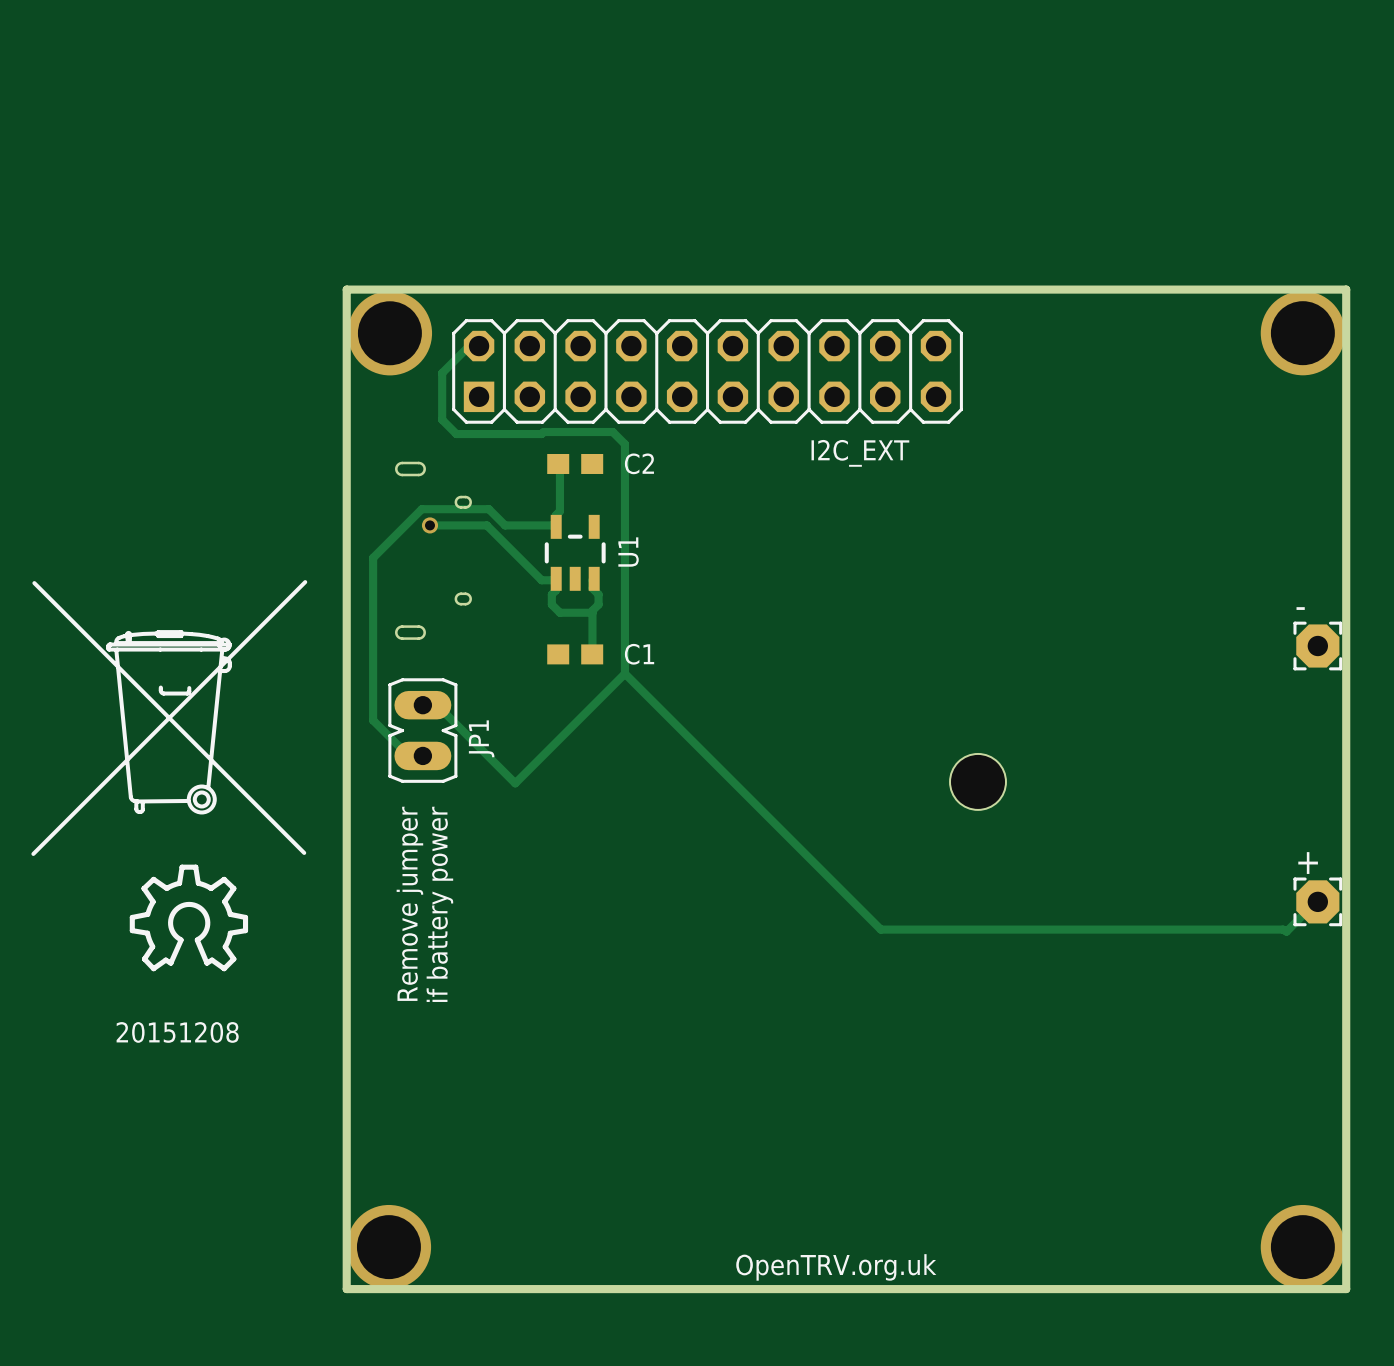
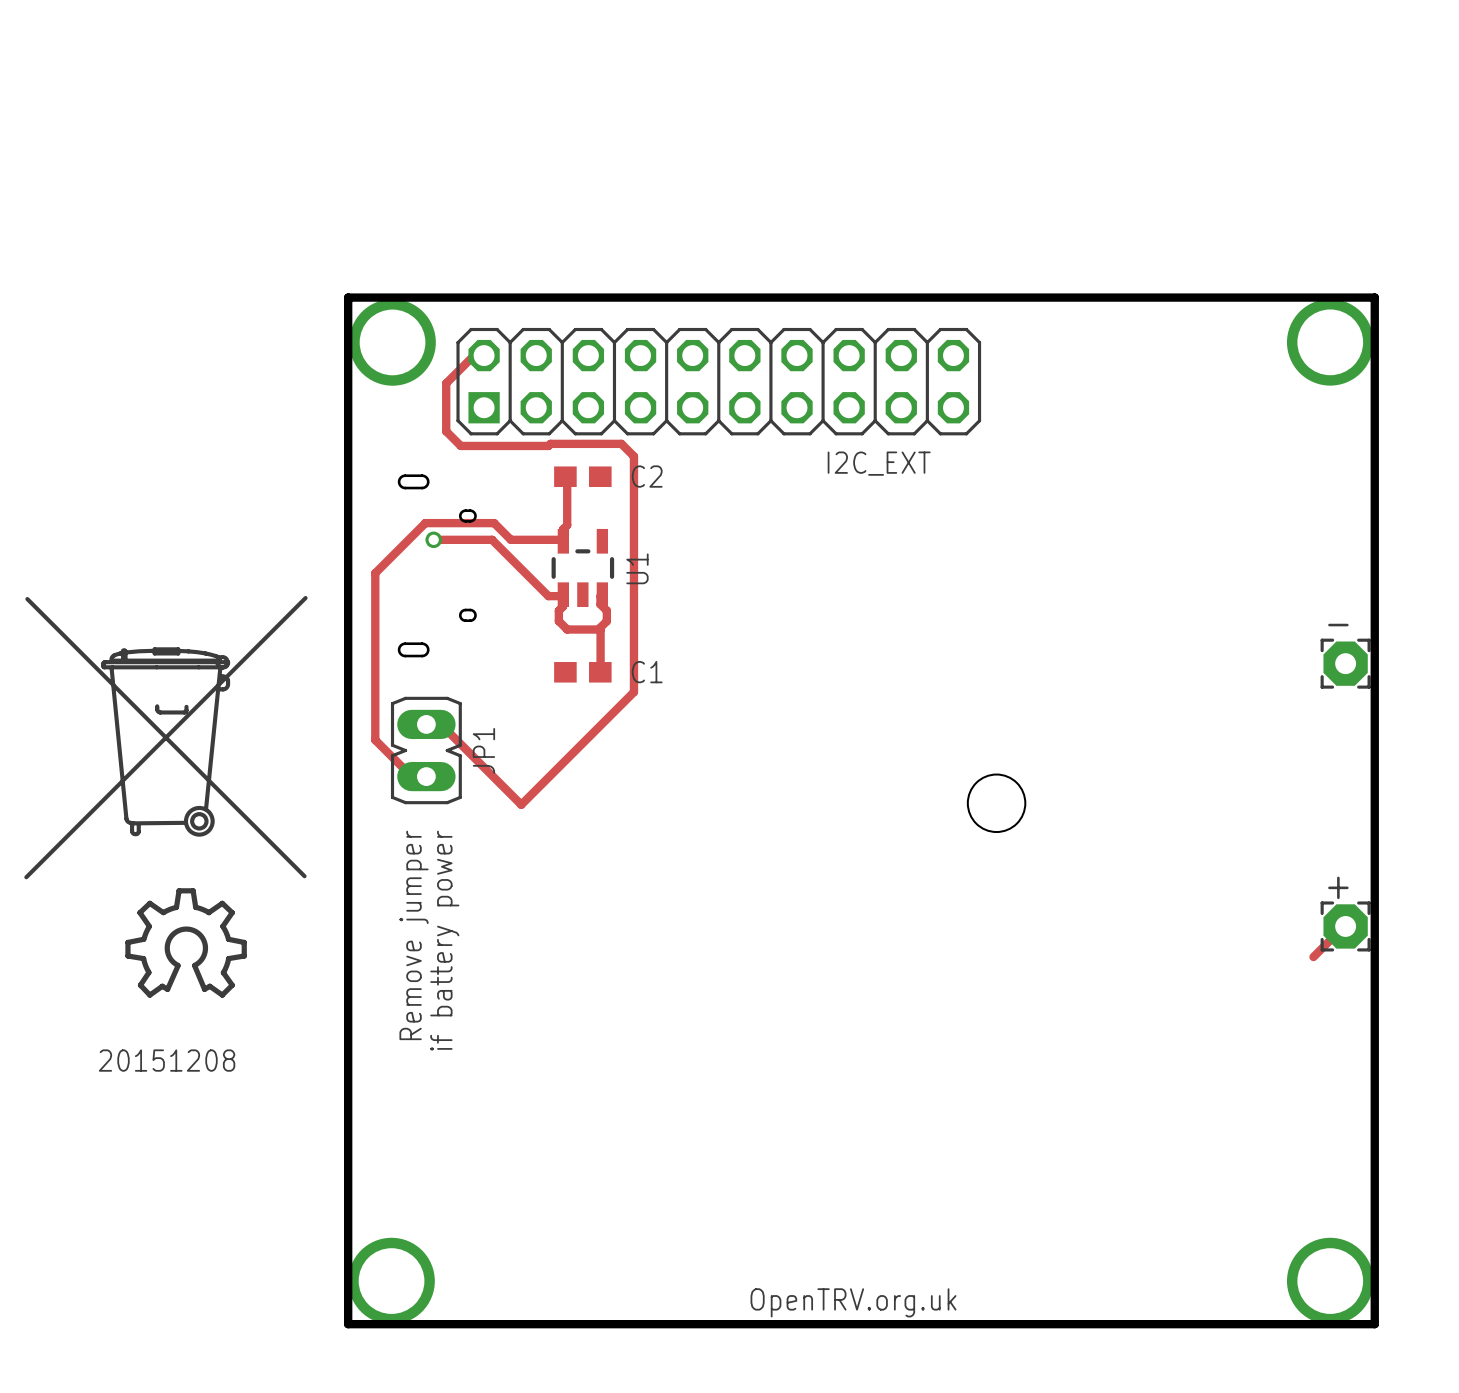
track: (624, 673) (880, 929) (1283, 929) (1286, 931) -> none

